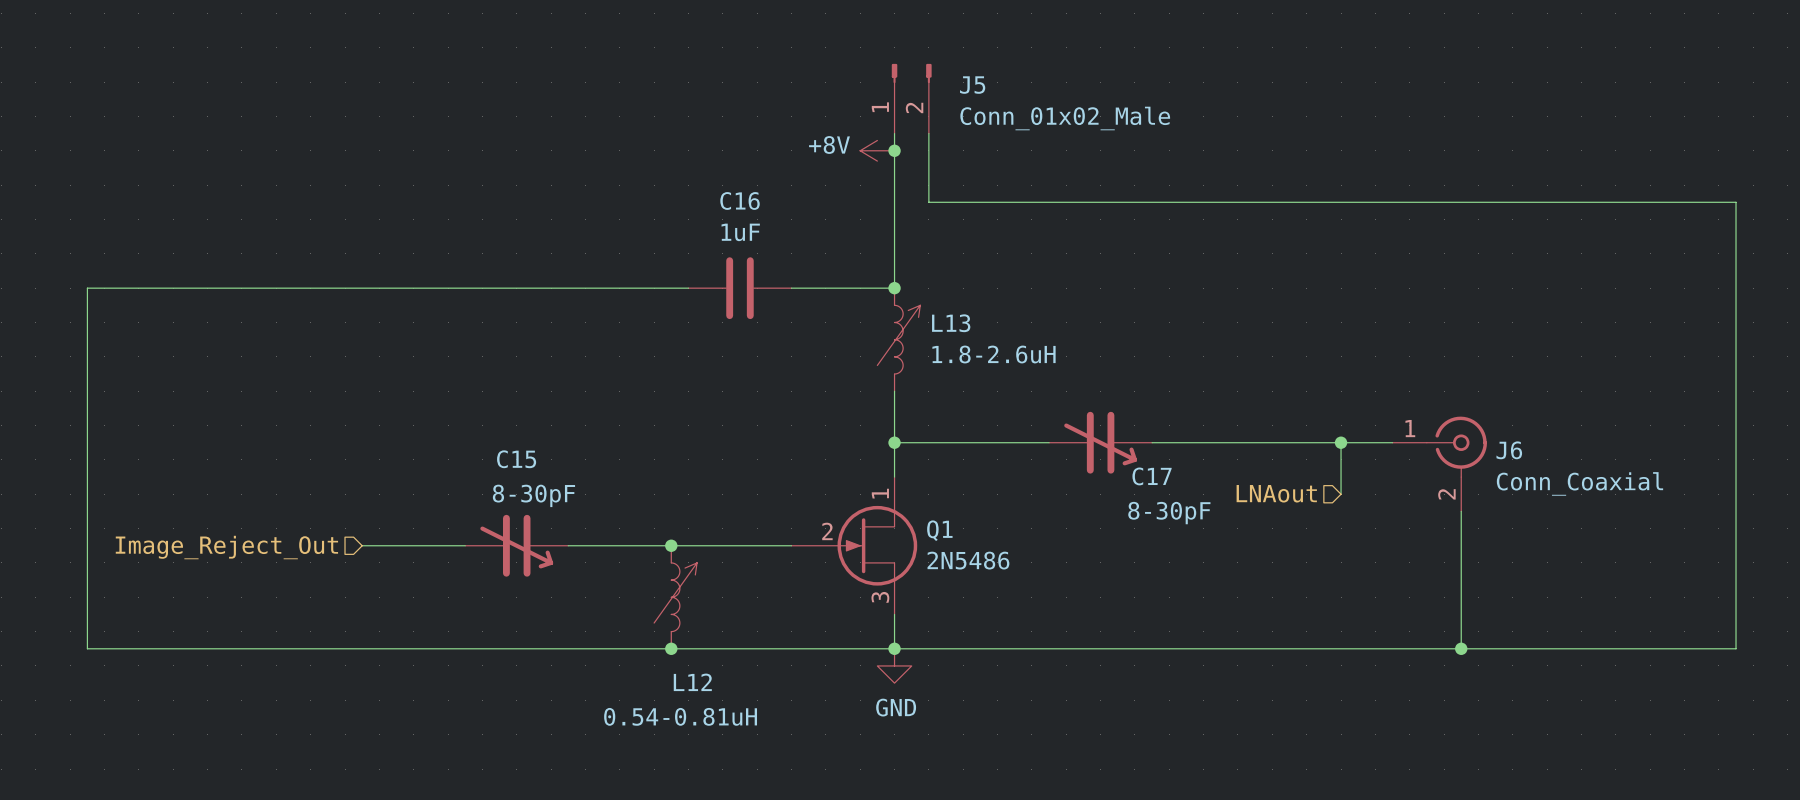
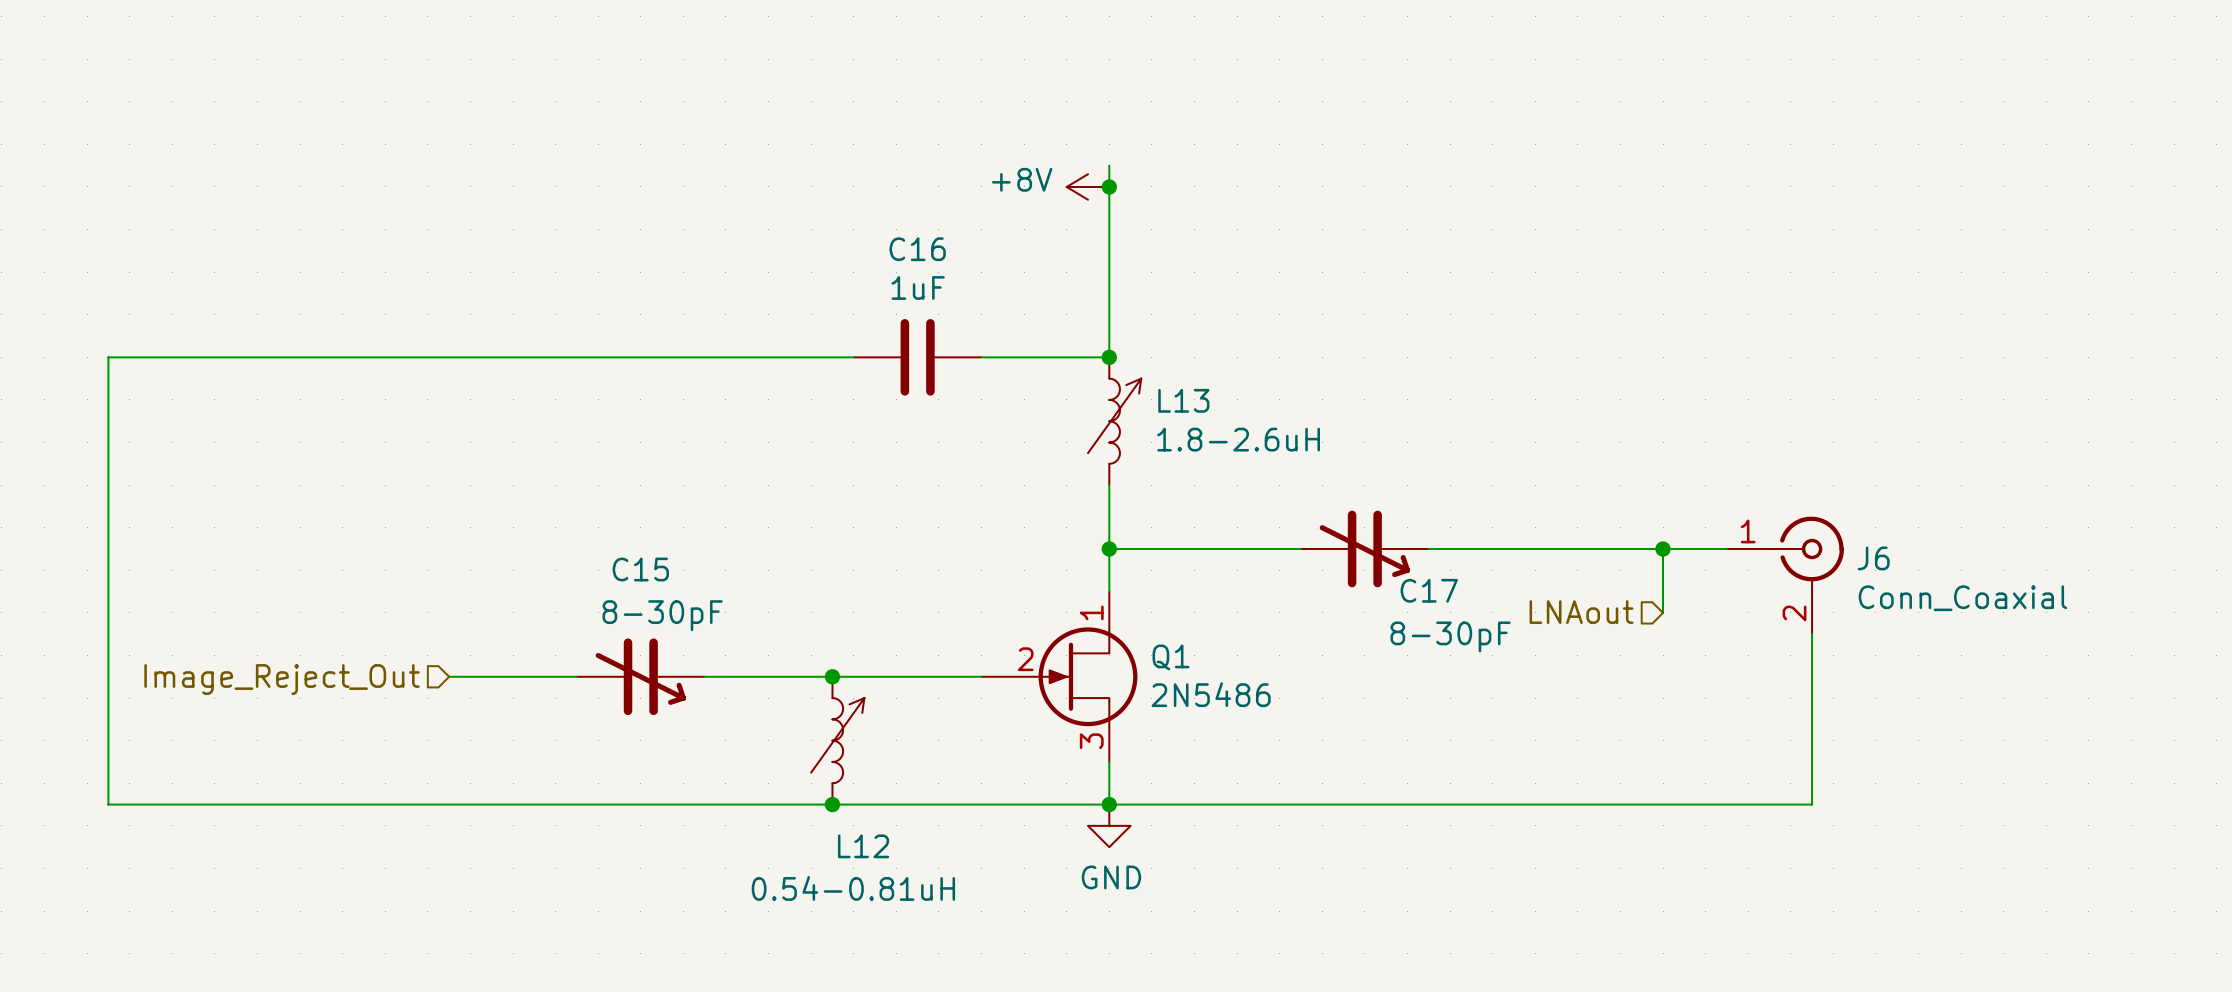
J5: Conn_01x02_Male (911, 98) -> none
wire: (928, 133) (928, 202) (1736, 202) (1736, 648) (1461, 648) -> none
junction: (1461, 648) -> none

